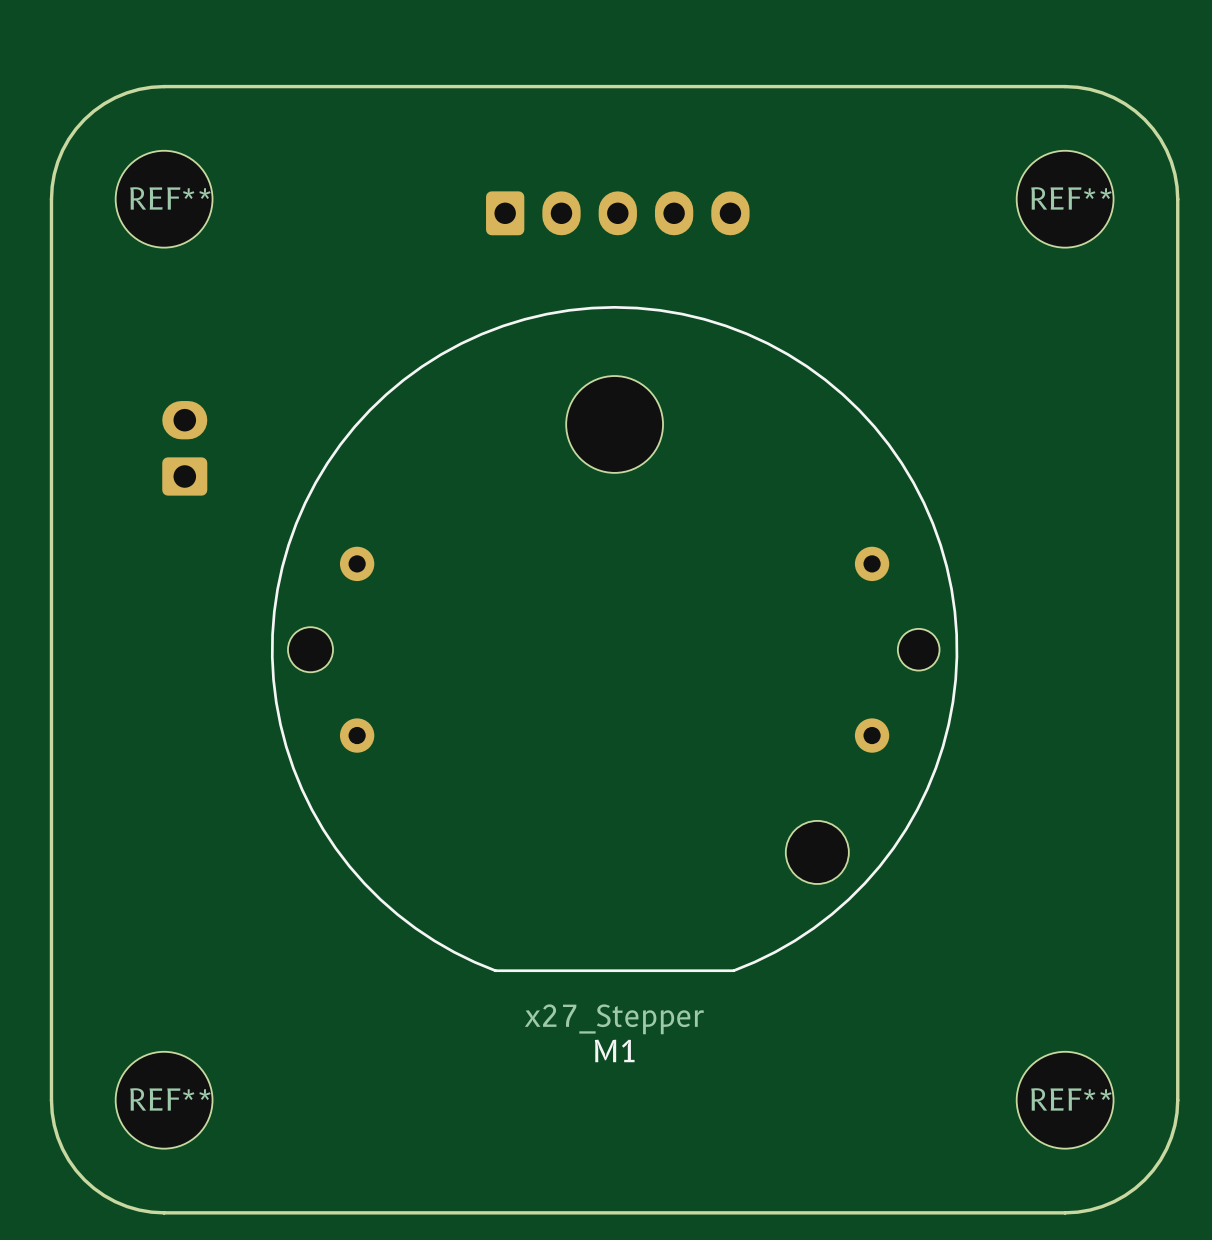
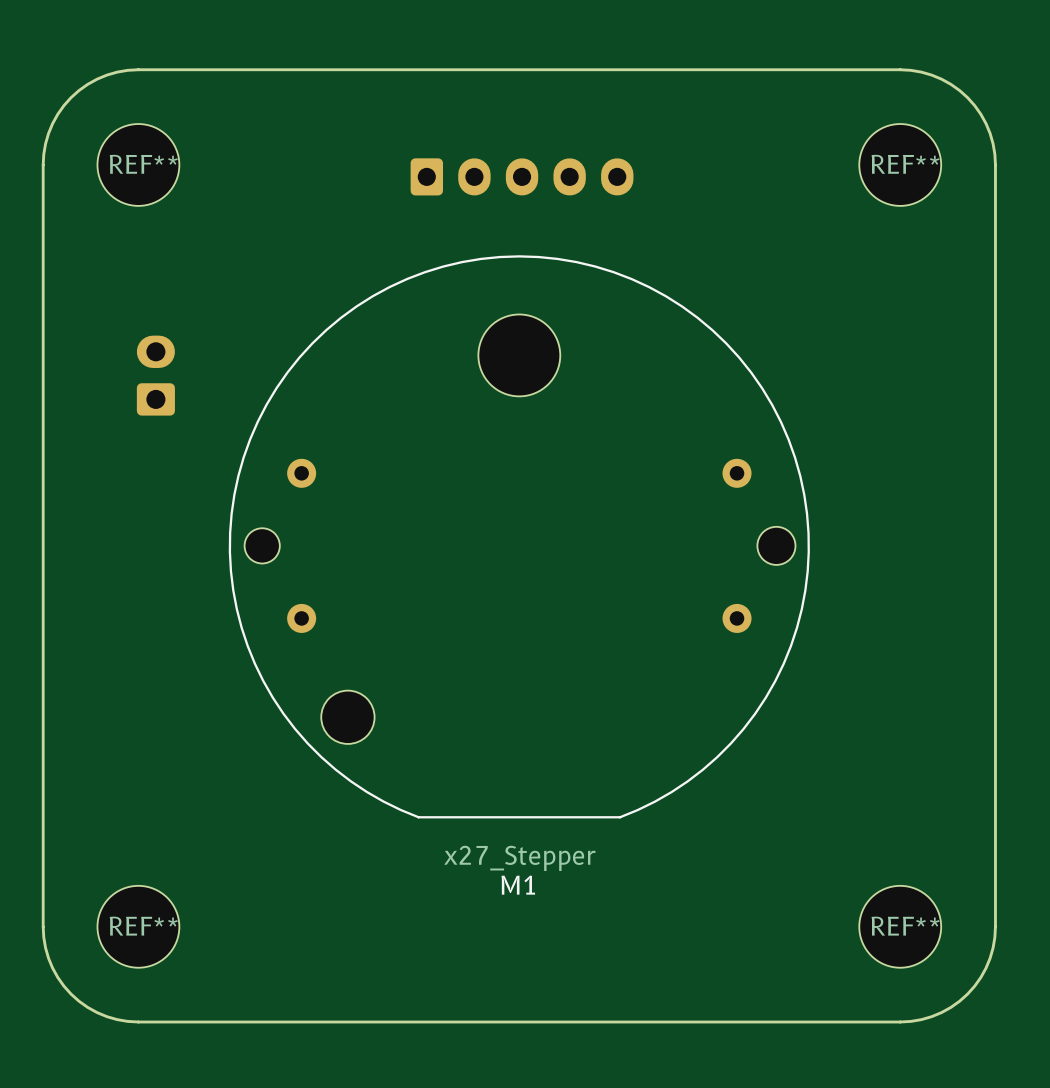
M1 footprint: [270, 305, 959, 973] -> [228, 255, 810, 819]

